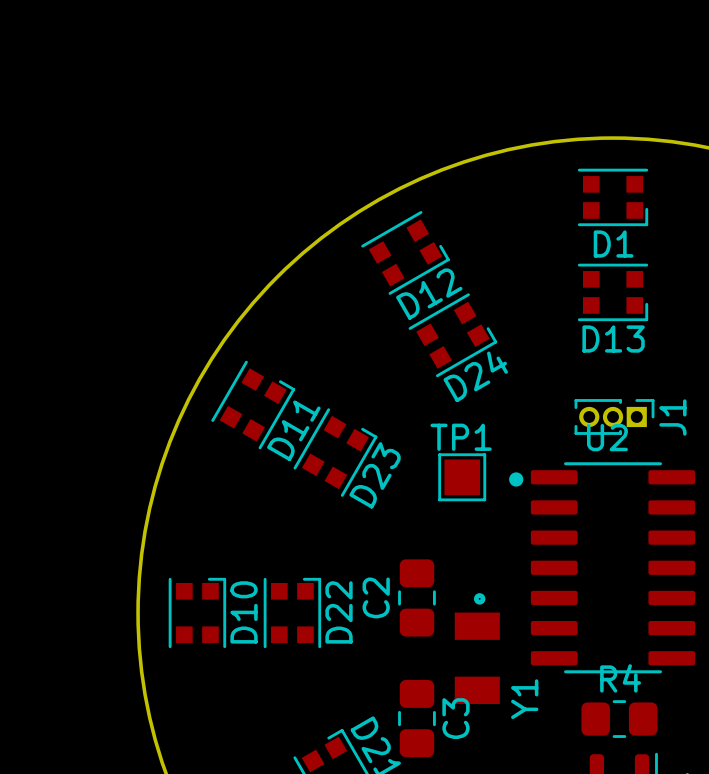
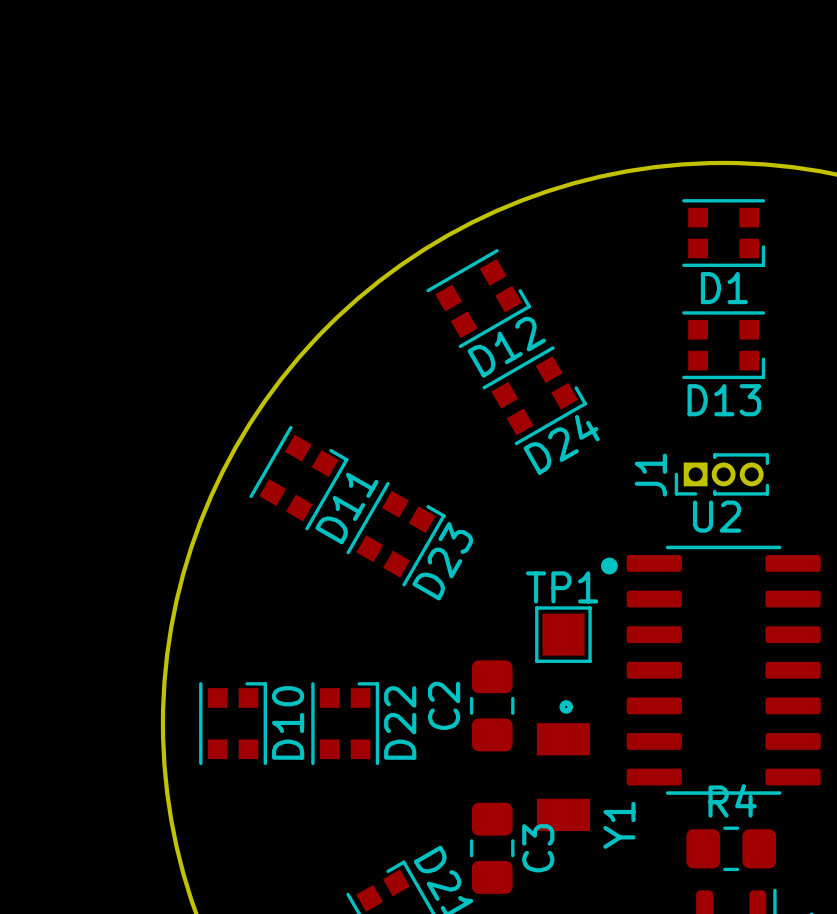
J1 rotation: 0° (614, 416) -> 180° (721, 474)
TP1 position: (462, 477) -> (563, 634)

